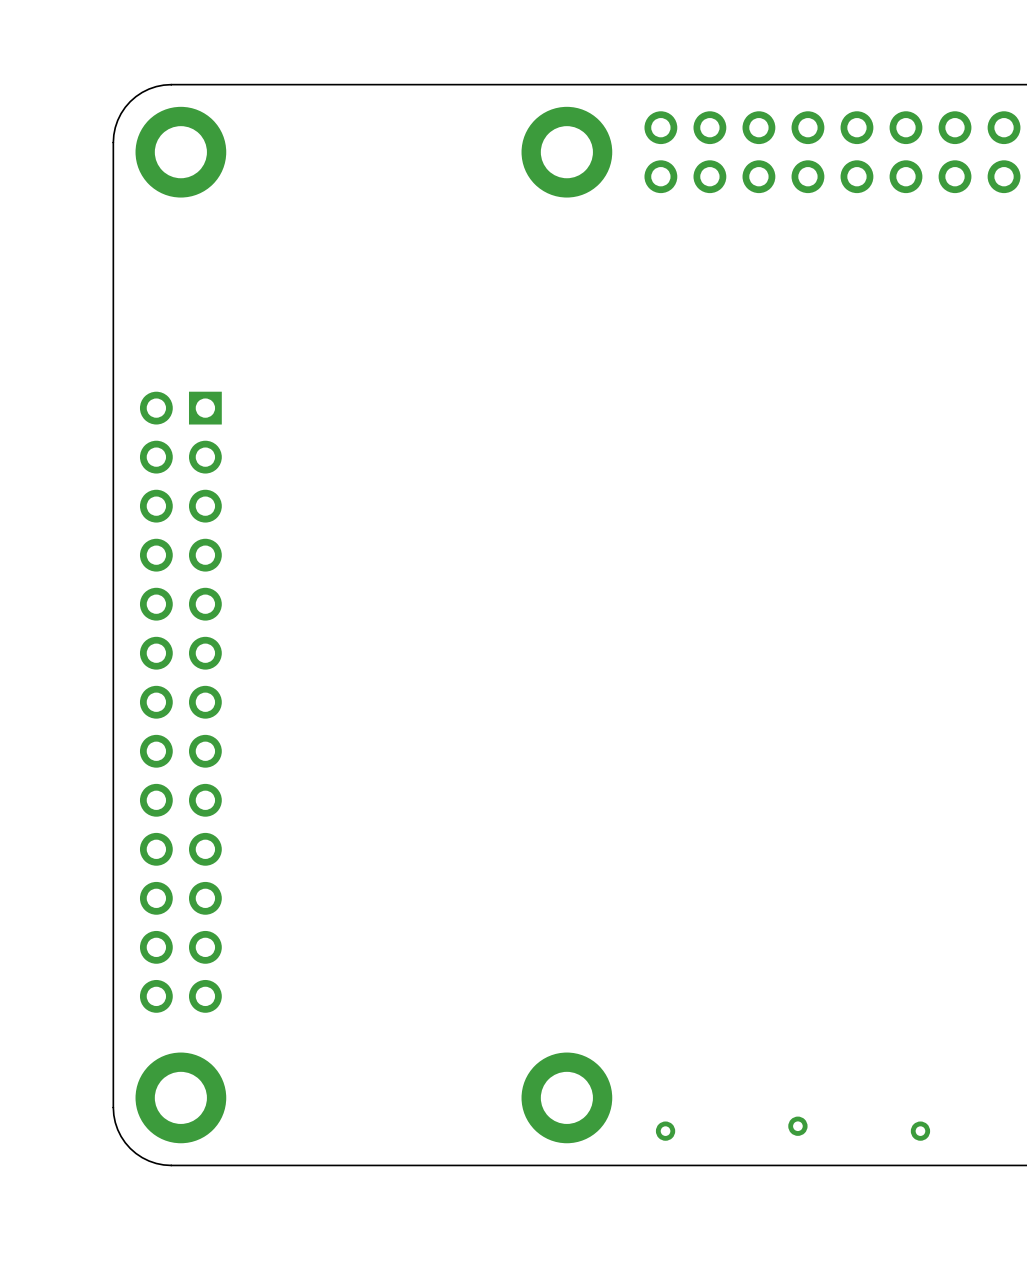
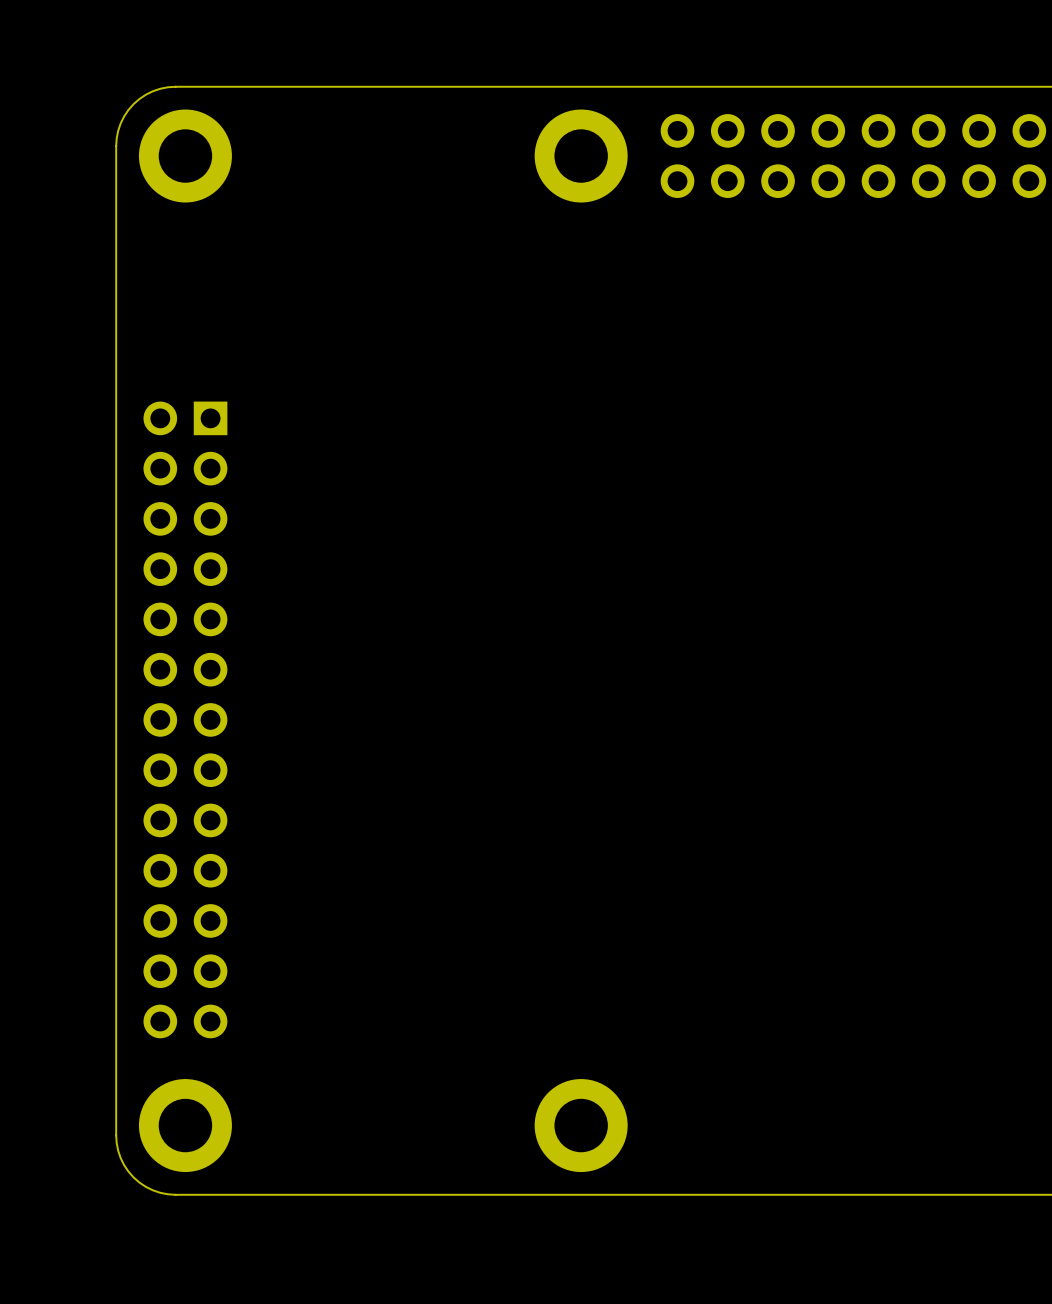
via: (797, 1126) -> none
via: (665, 1131) -> none
via: (920, 1131) -> none

